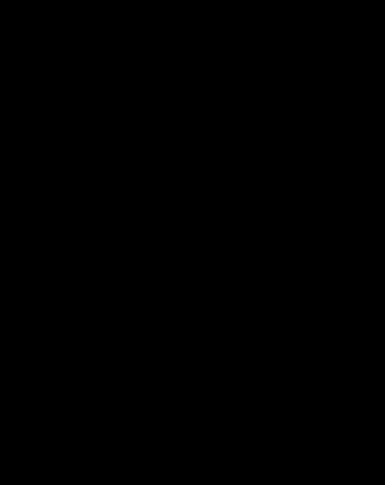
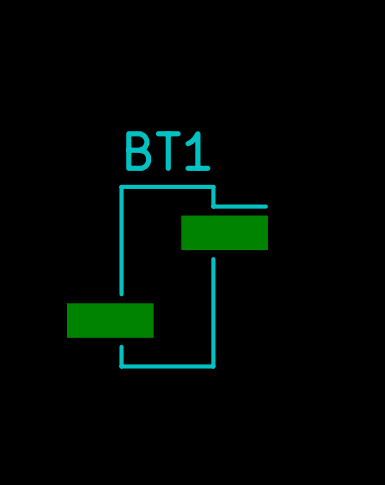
BT1: none -> (167, 276)

